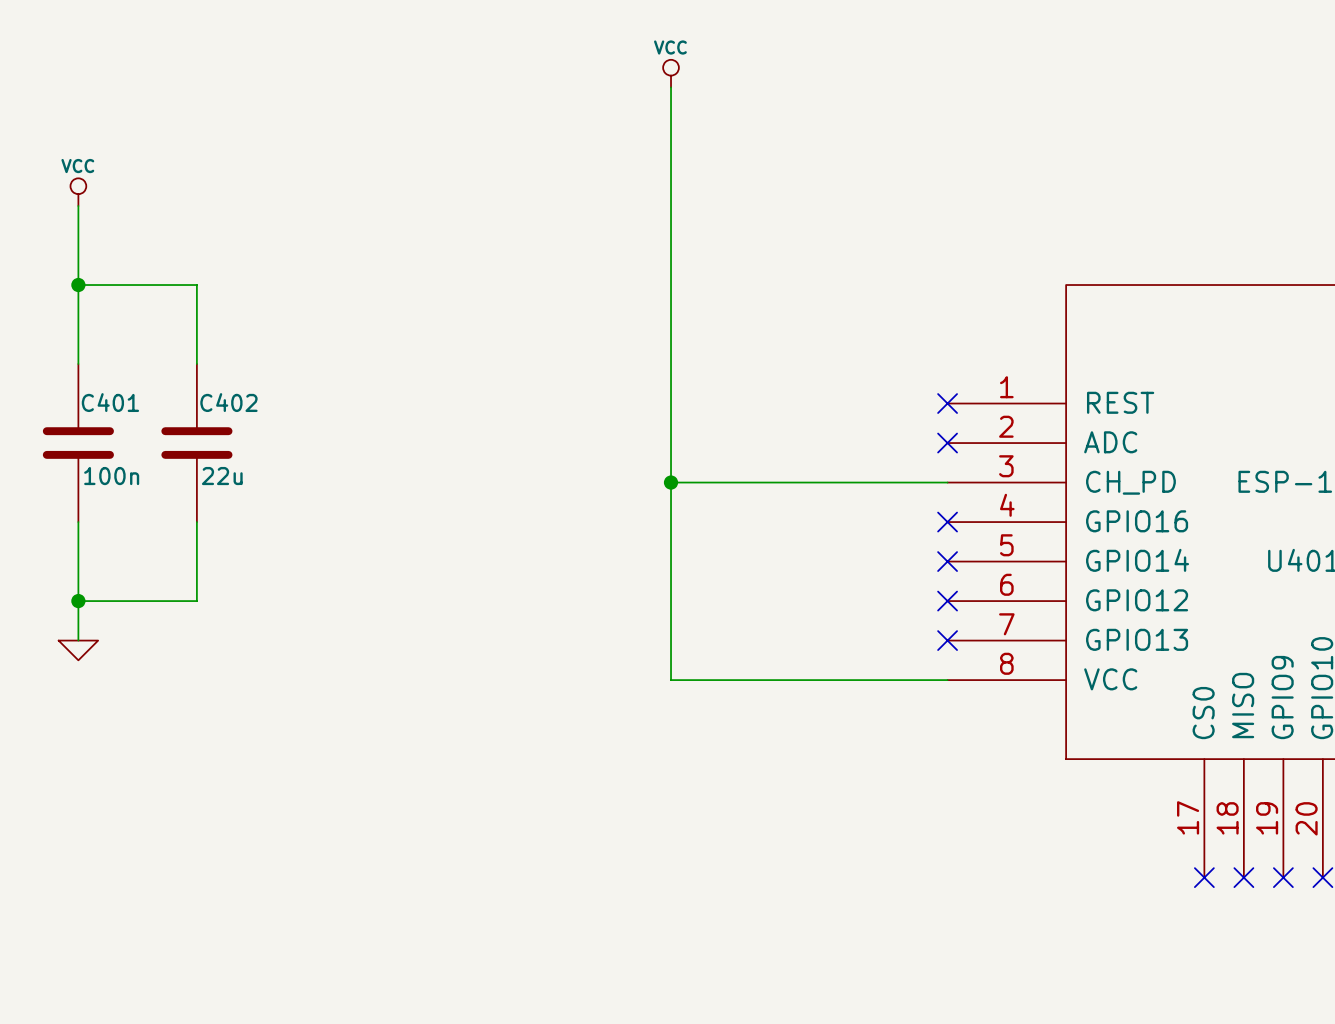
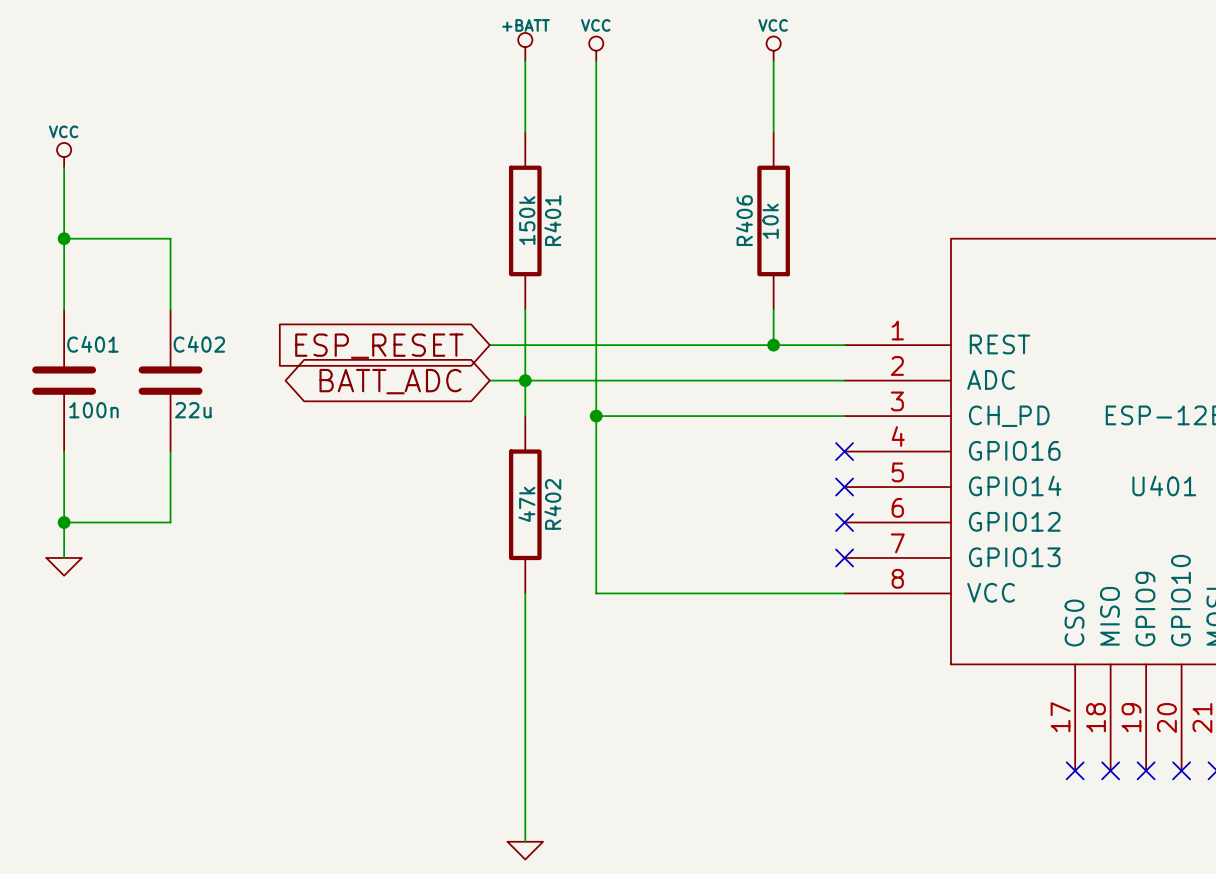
power symbol: none -> +BATT (525, 47)
power symbol: none -> VCC (773, 48)
wire: none -> (525, 61) (525, 132)
wire: none -> (773, 61) (773, 132)
R401: none -> 150k (525, 220)
R406: none -> 10k (773, 220)
wire: none -> (525, 309) (525, 416)
wire: none -> (773, 309) (773, 345)
wire: none -> (489, 345) (844, 345)
junction: none -> (773, 345)
no-connect mark: (947, 403) -> none
global label: none -> ESP_RESET (379, 346)
wire: none -> (489, 380) (844, 380)
junction: none -> (525, 380)
no-connect mark: (947, 443) -> none
global label: none -> BATT_ADC (390, 381)
R402: none -> 47k (525, 504)
wire: none -> (525, 593) (525, 841)
power symbol: none -> (525, 850)

